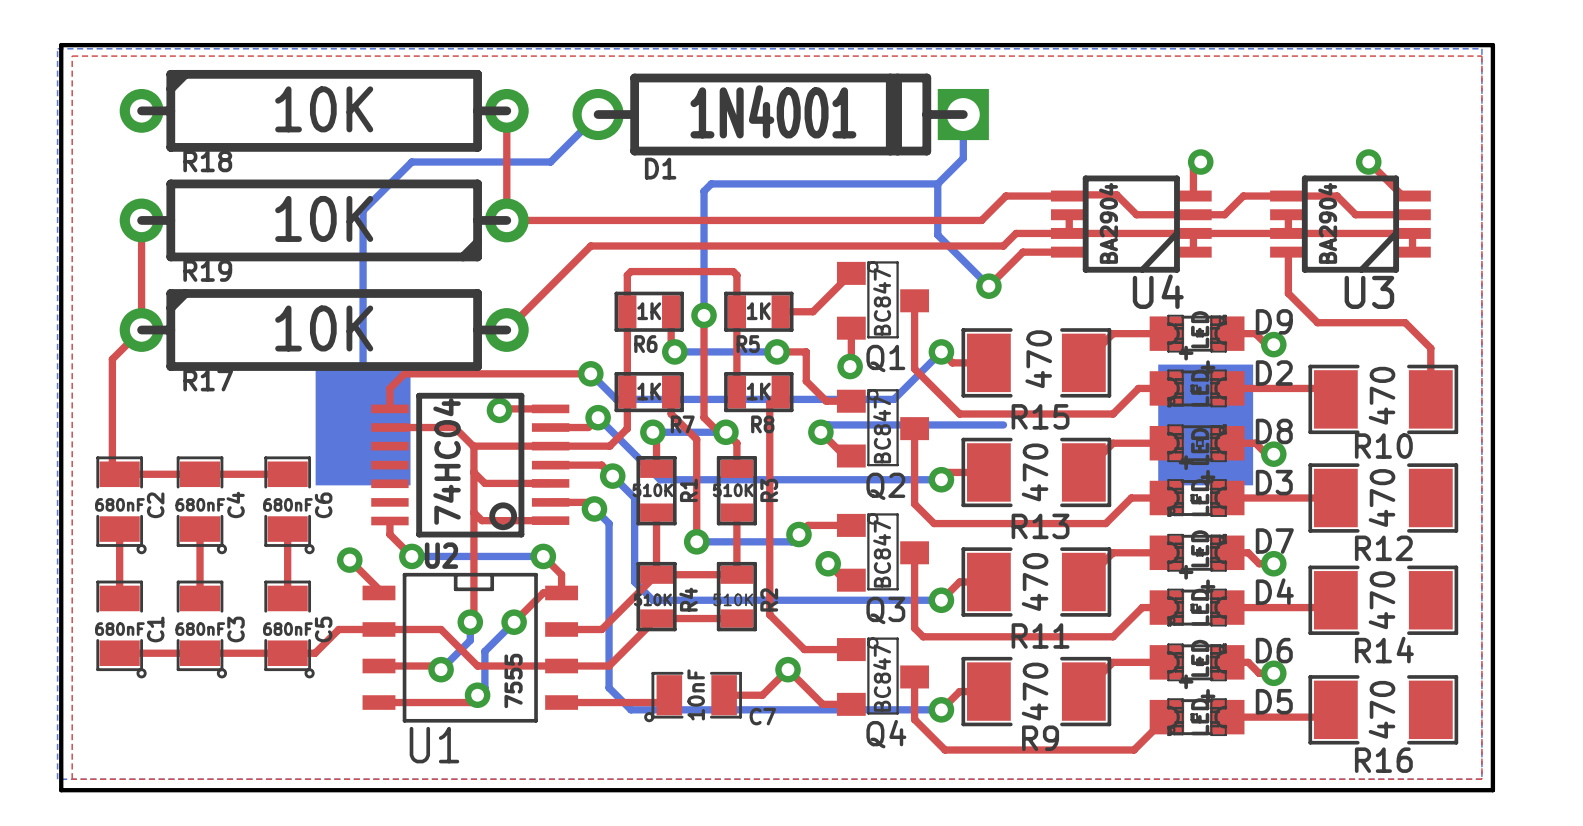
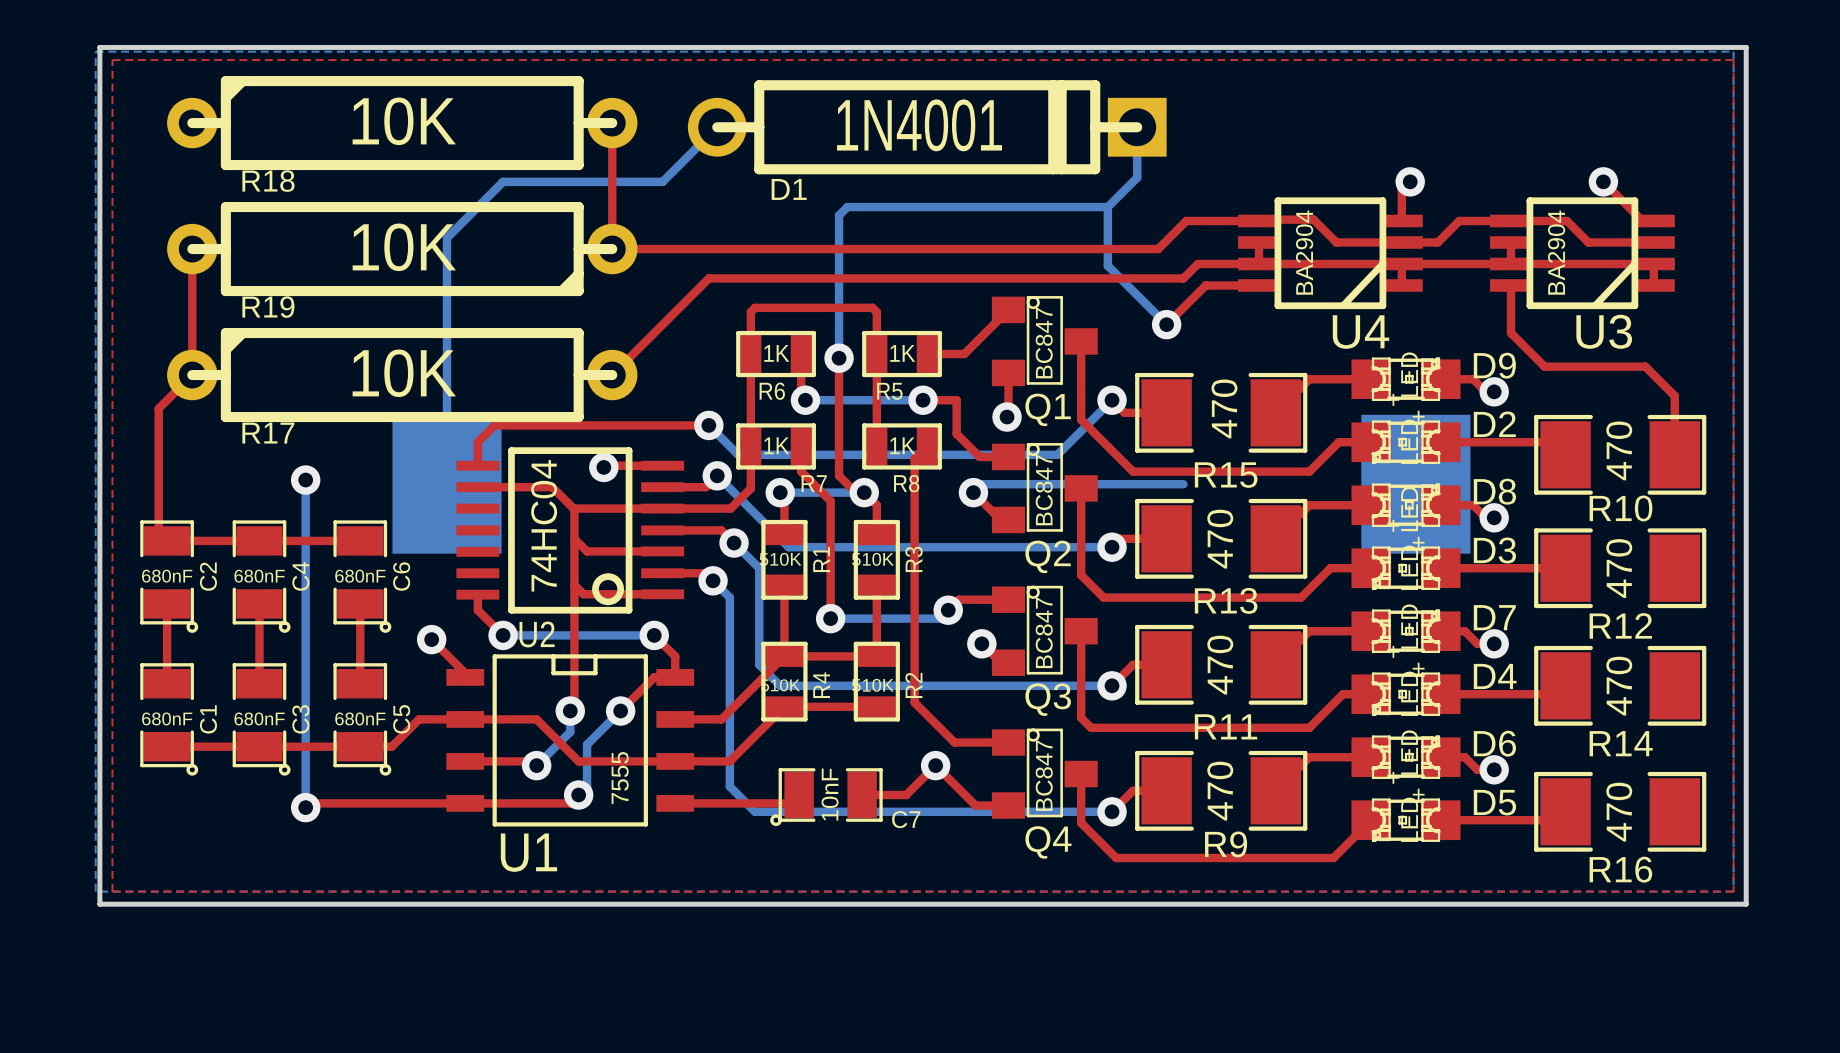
bottom track: none -> (305, 480) (305, 807)
via: none -> (305, 480)
top track: none -> (465, 803) (309, 803) (305, 807)
via: none -> (305, 807)

